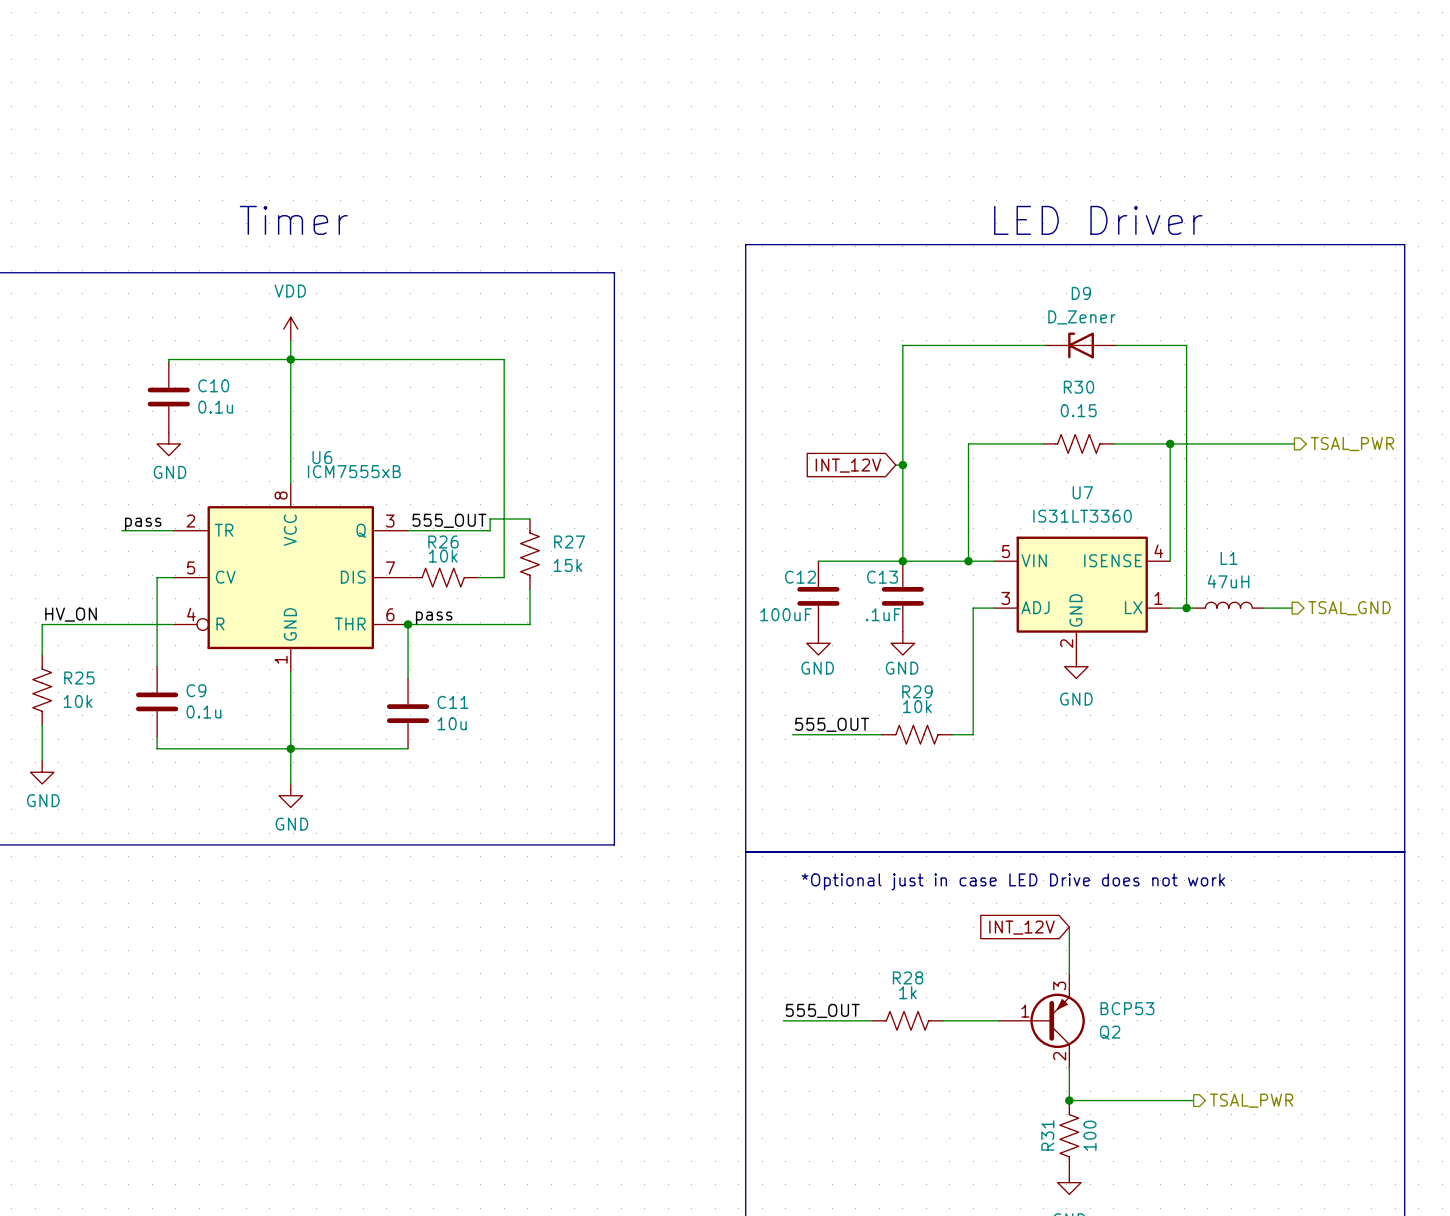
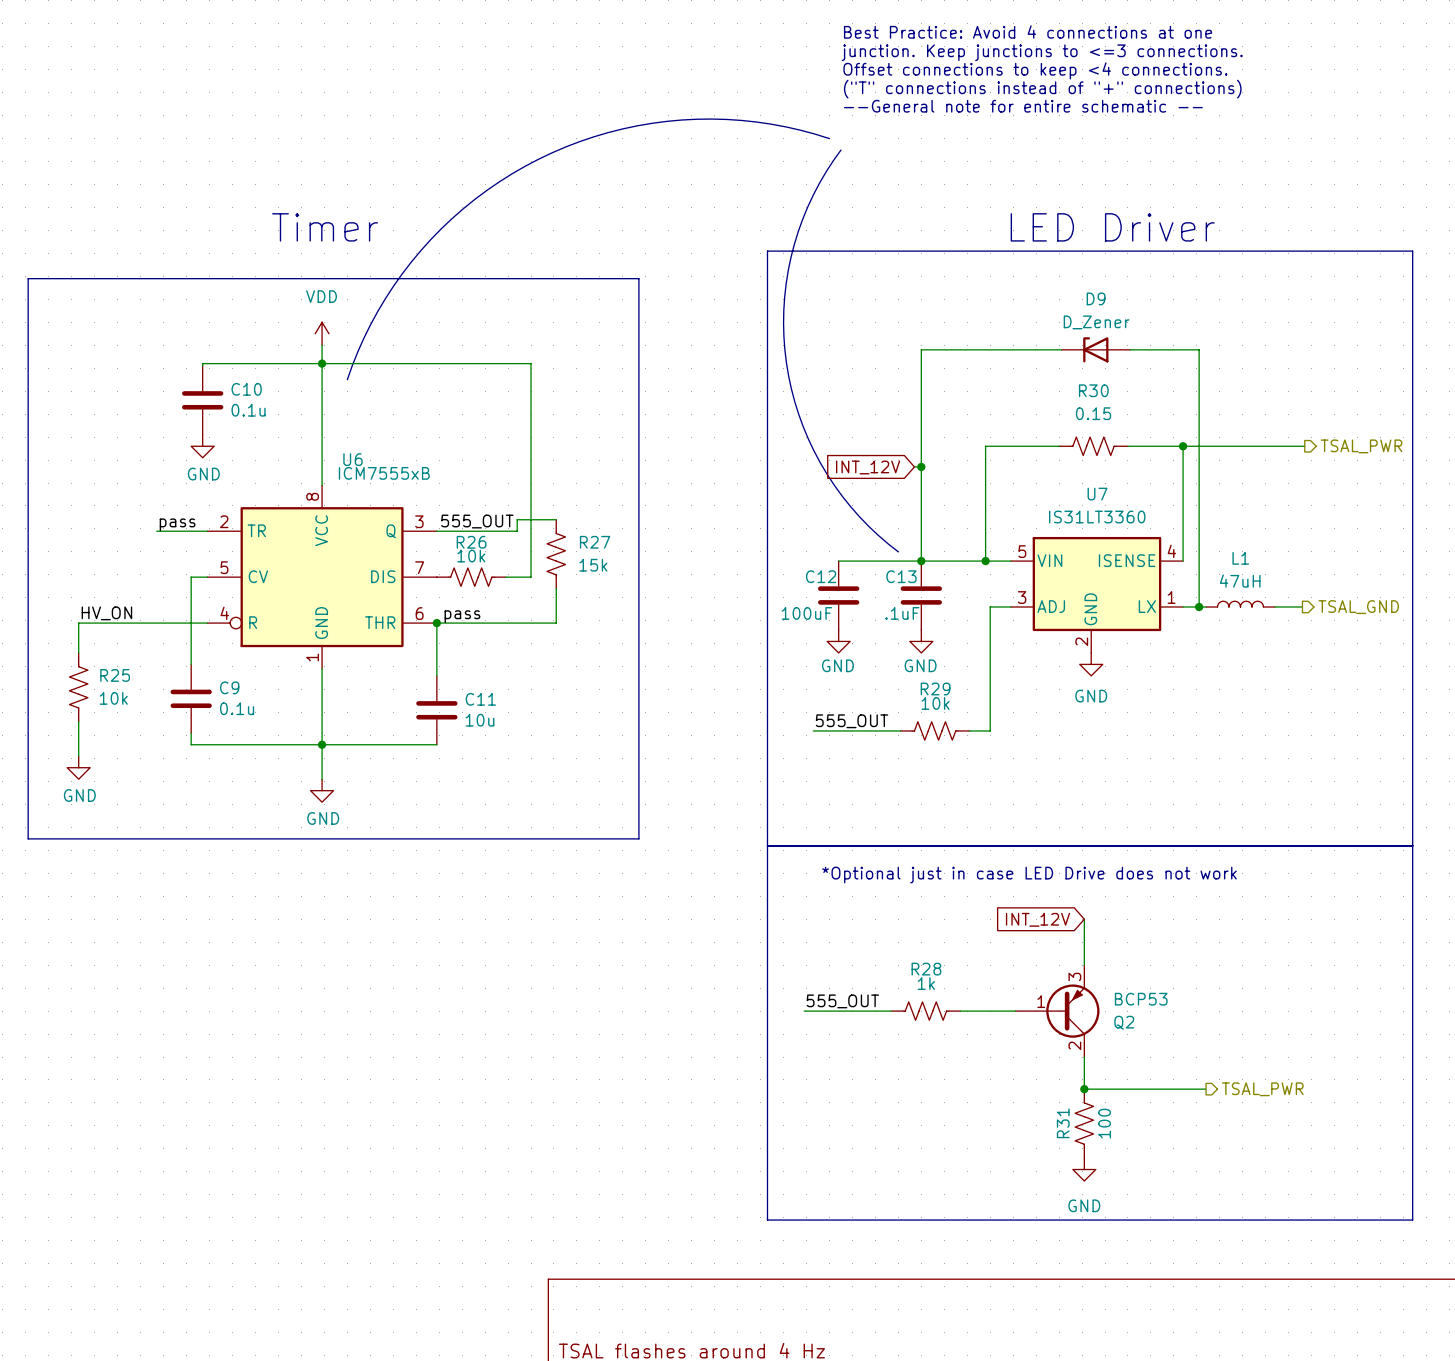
text: none -> Best Practice: Avoid 4 connections at one (1028, 32)
text: none -> junction. Keep junctions to <=3 connections. (1042, 52)
text: none -> Offset connections to keep <4 connections. (1035, 70)
text: none -> ("T" connections instead of "+" connections) (1042, 89)
text: none -> --General note for entire schematic -- (1023, 106)
line: none -> (829, 138) (800, 130) (756, 122) (726, 119) (681, 120) (652, 123) (608, 132) (565, 146) (538, 159) (512, 173) (475, 199) (452, 218) (420, 250) (402, 273) (377, 311) (357, 351) (347, 379)
line: none -> (840, 150) (813, 195) (794, 244) (784, 296) (783, 336) (786, 362) (798, 414) (820, 462) (834, 485) (859, 516) (898, 551)

